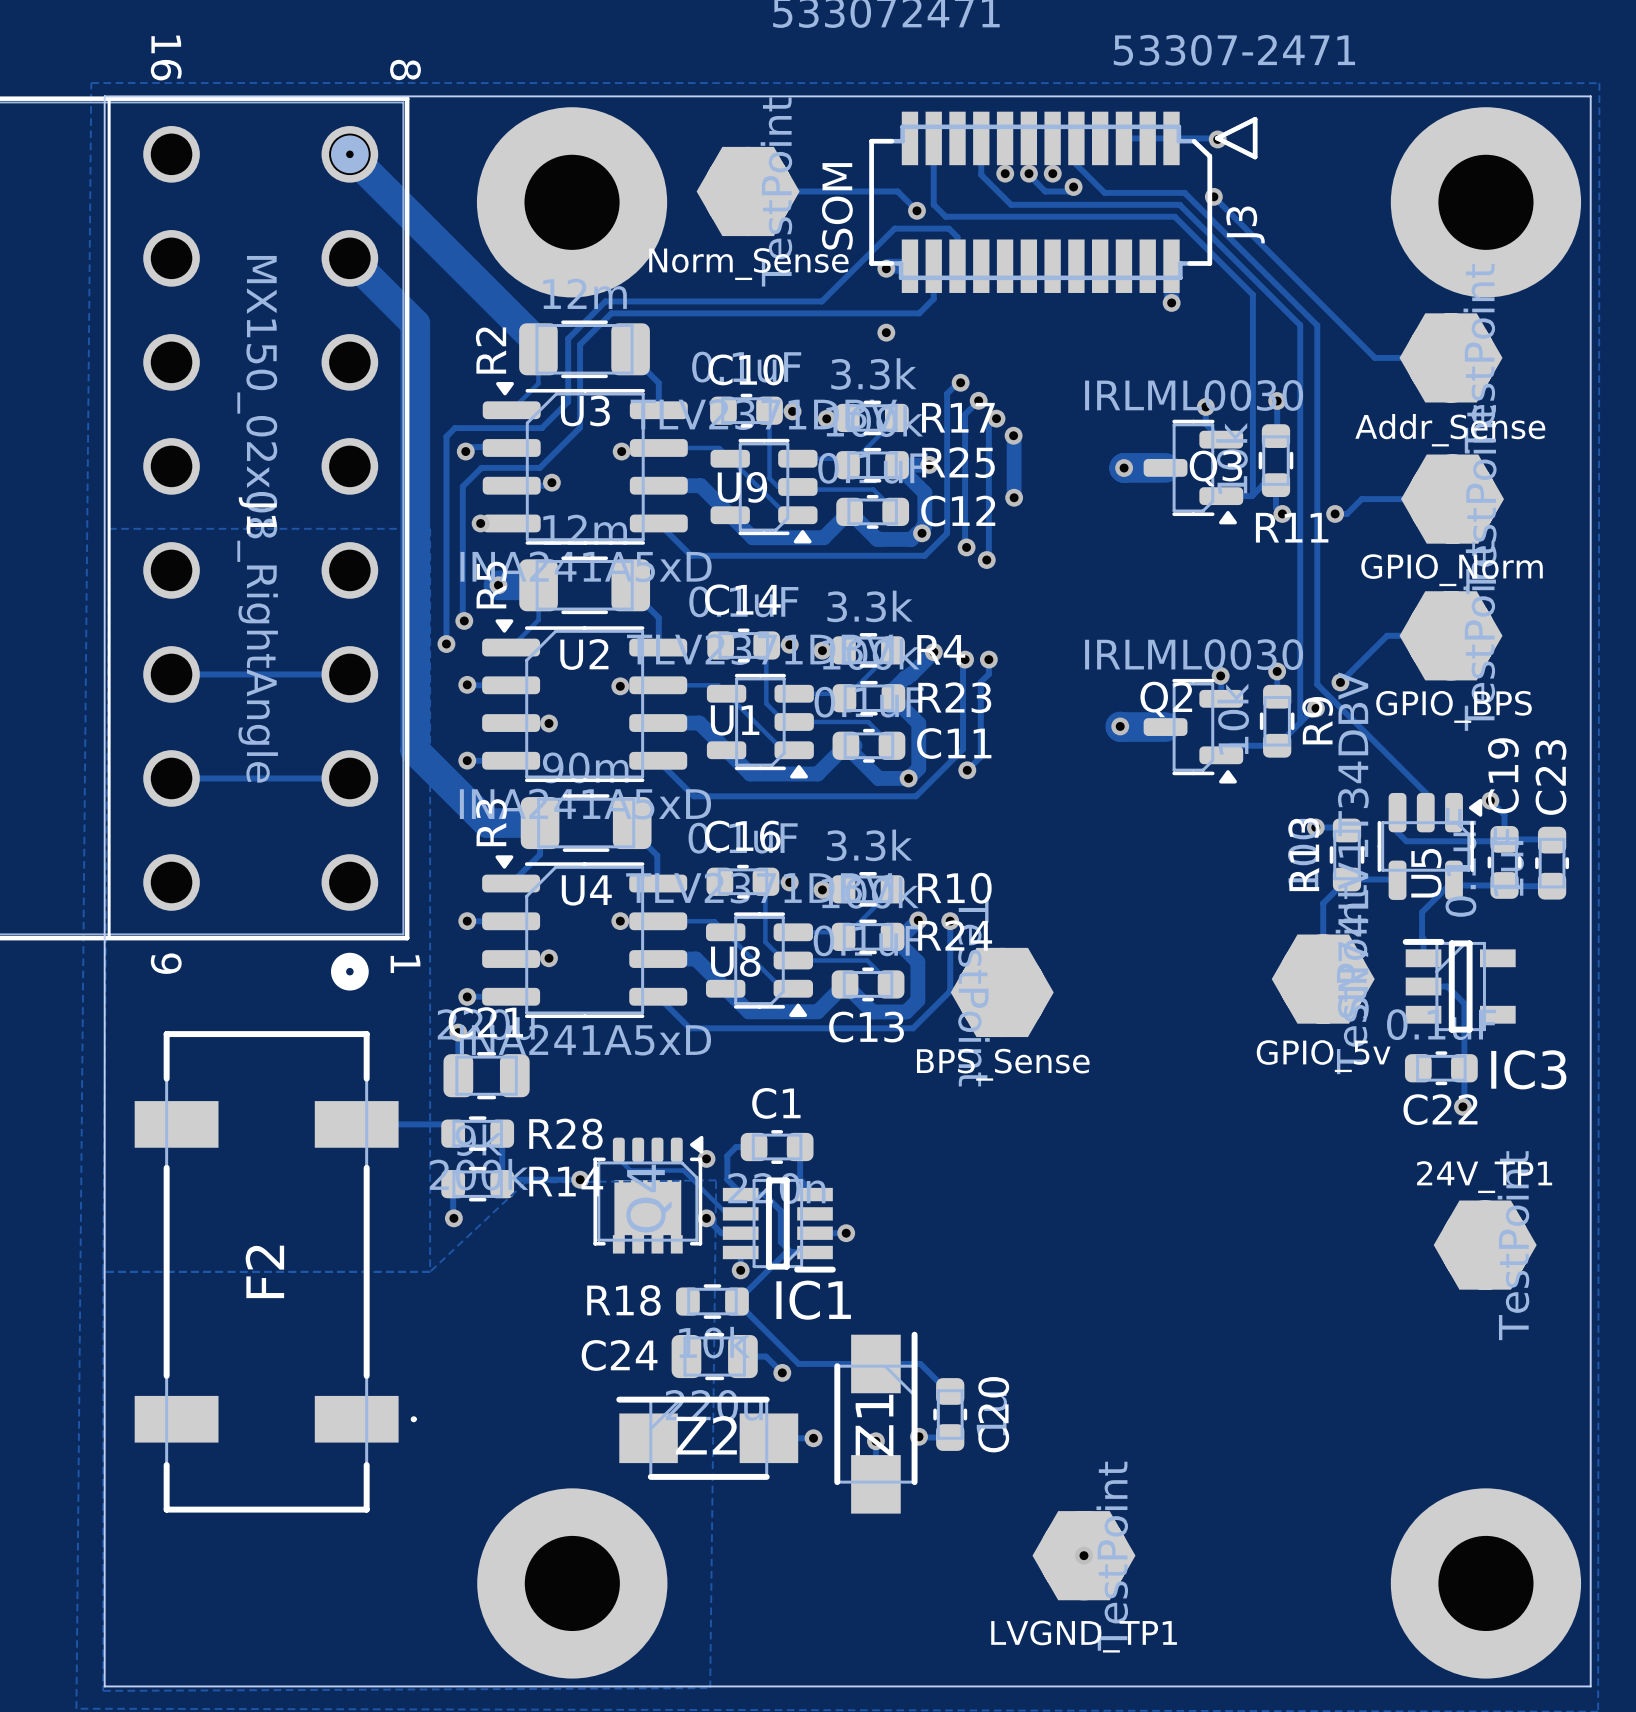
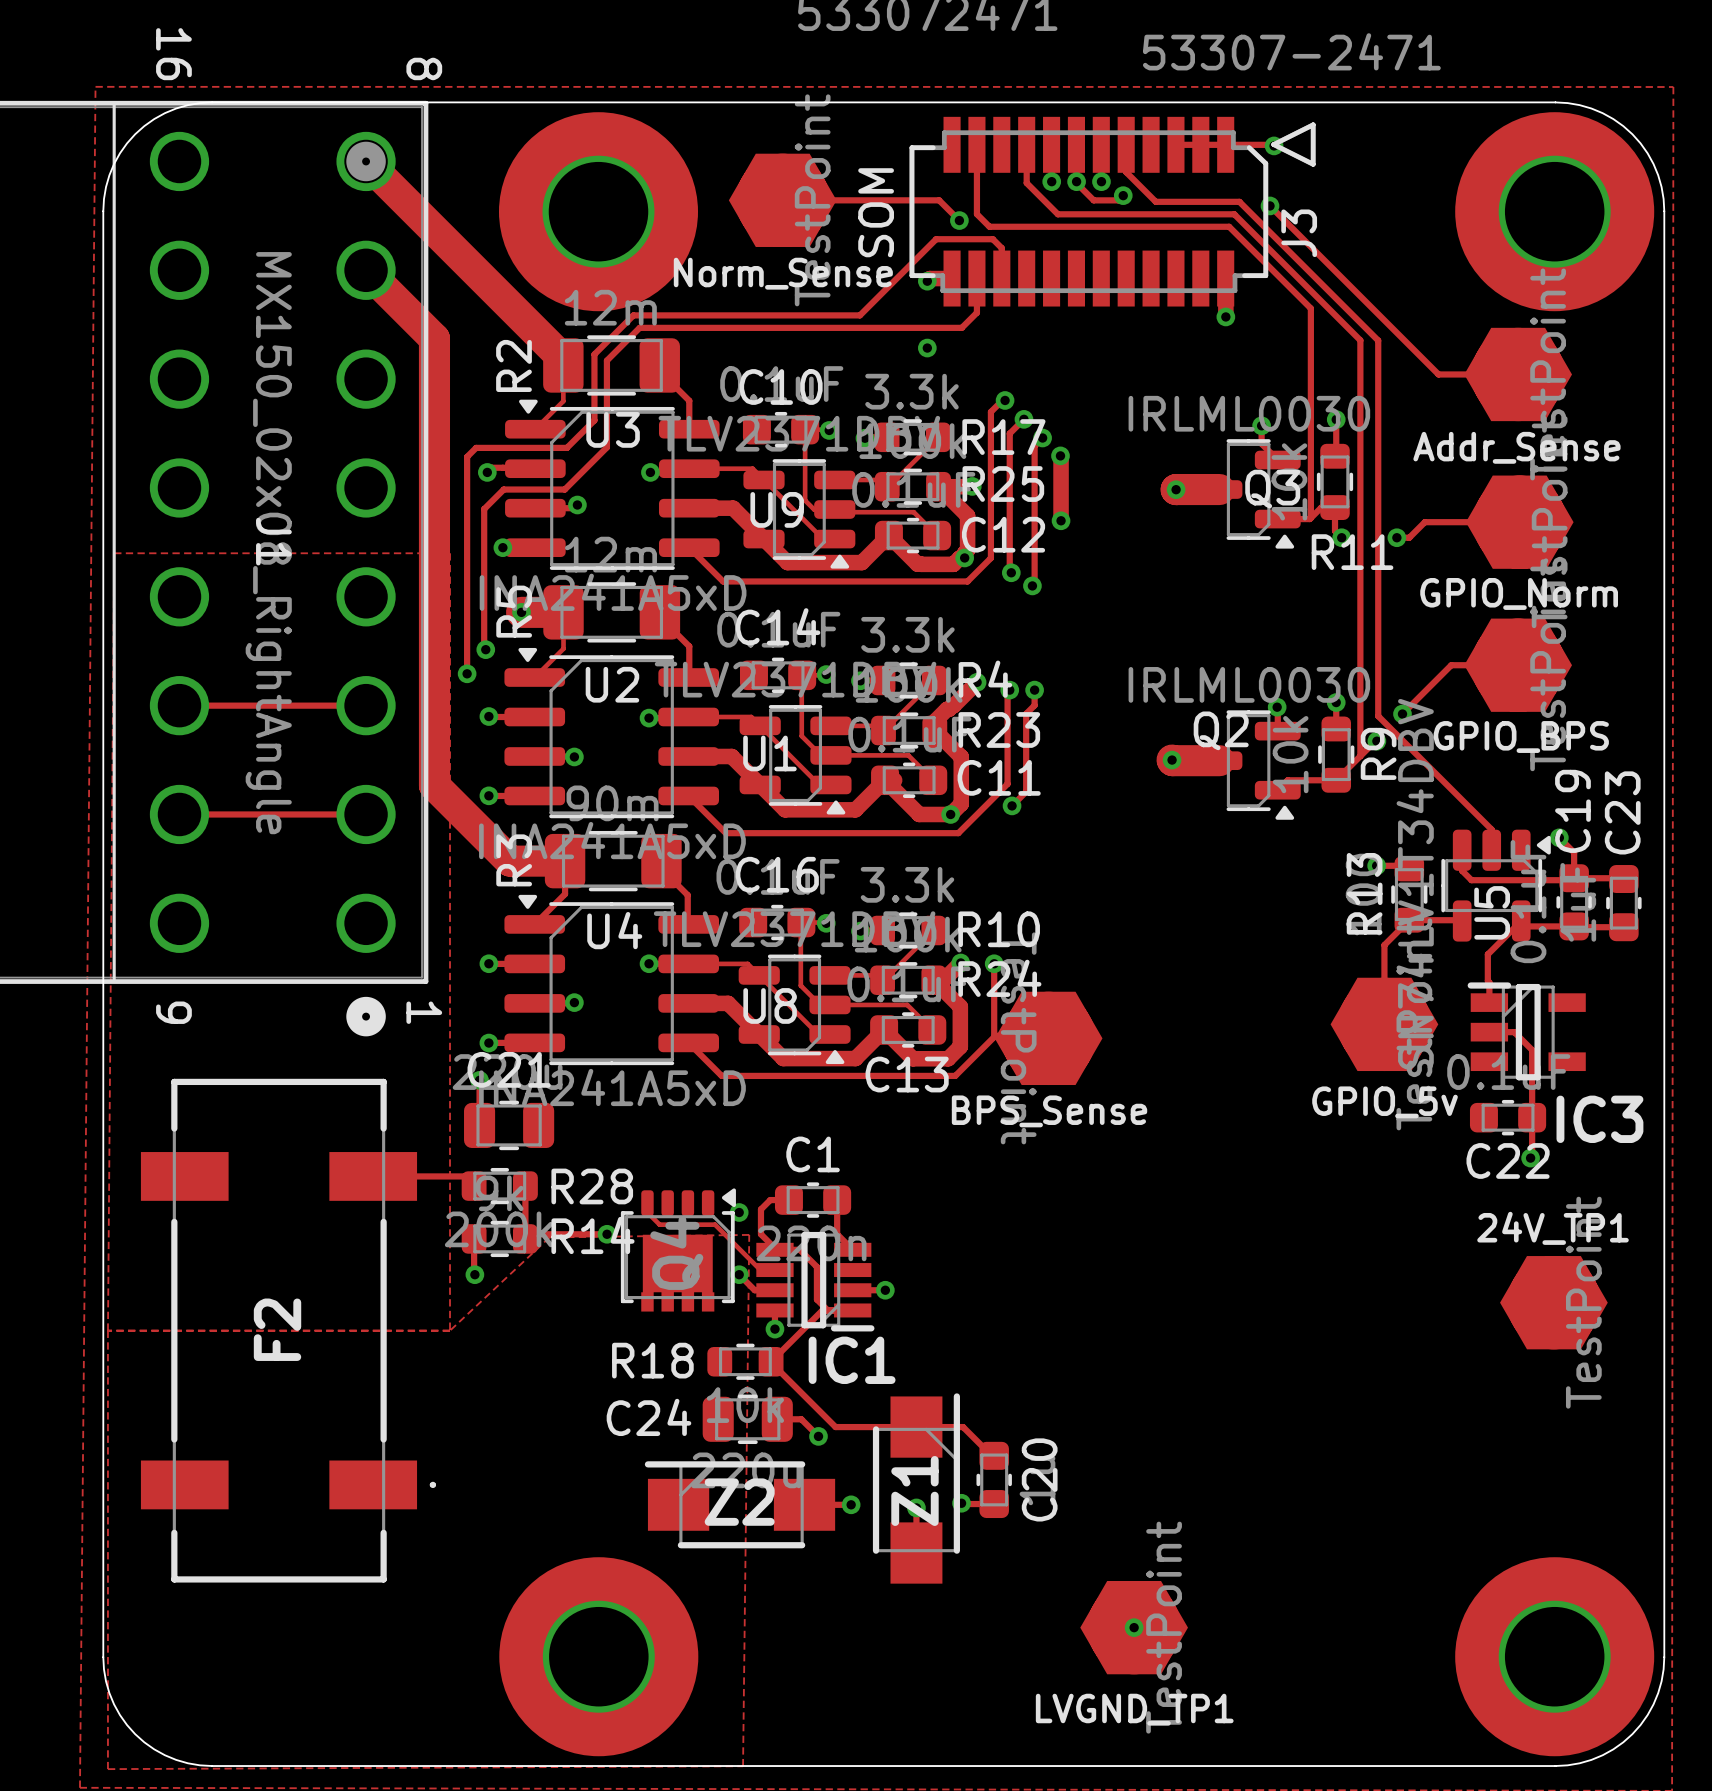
board edge: (1590, 201) (1590, 96) (104, 96) (104, 1686) (1590, 1686) (1590, 1583) -> (1664, 211) (1658, 175) (1647, 153) (1632, 134) (1602, 113) (1579, 105) (1555, 102) (199, 103) (164, 113) (144, 126) (127, 143) (109, 175) (103, 211) (103, 1657) (106, 1681) (114, 1704) (135, 1734) (154, 1749) (176, 1759) (212, 1766) (1555, 1766) (1579, 1763) (1602, 1755) (1632, 1734) (1647, 1715) (1658, 1693) (1664, 1657)

